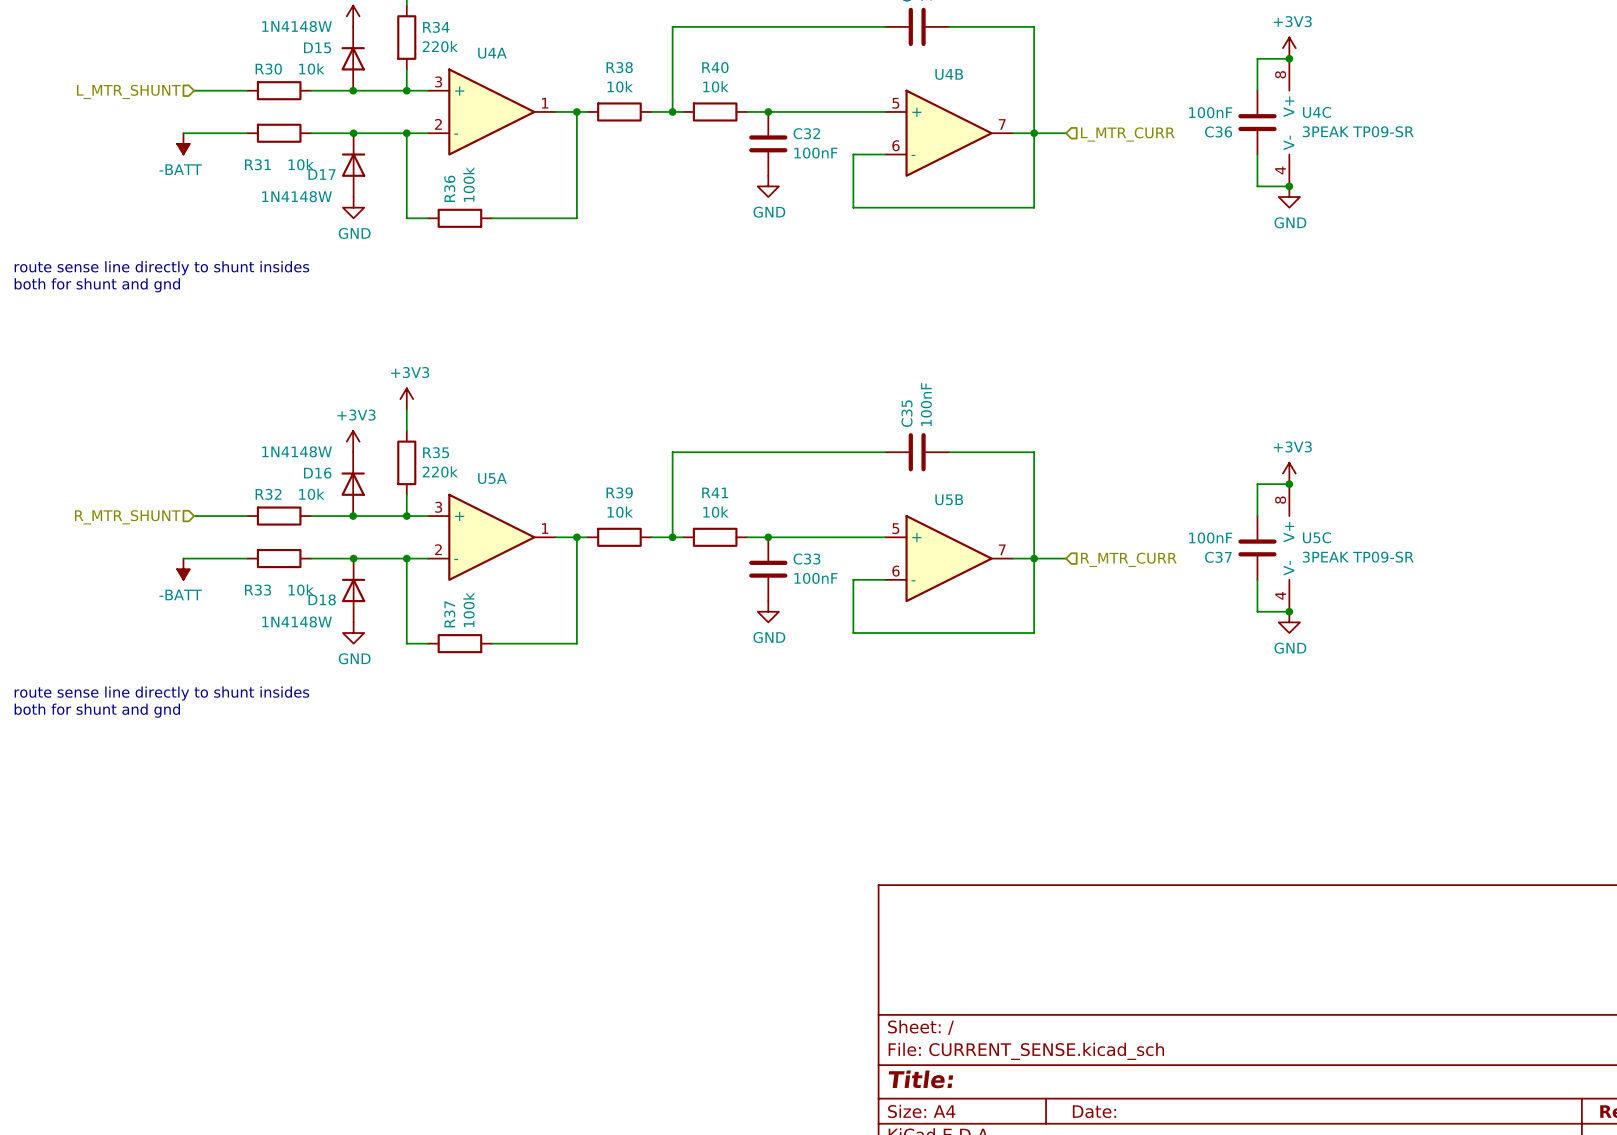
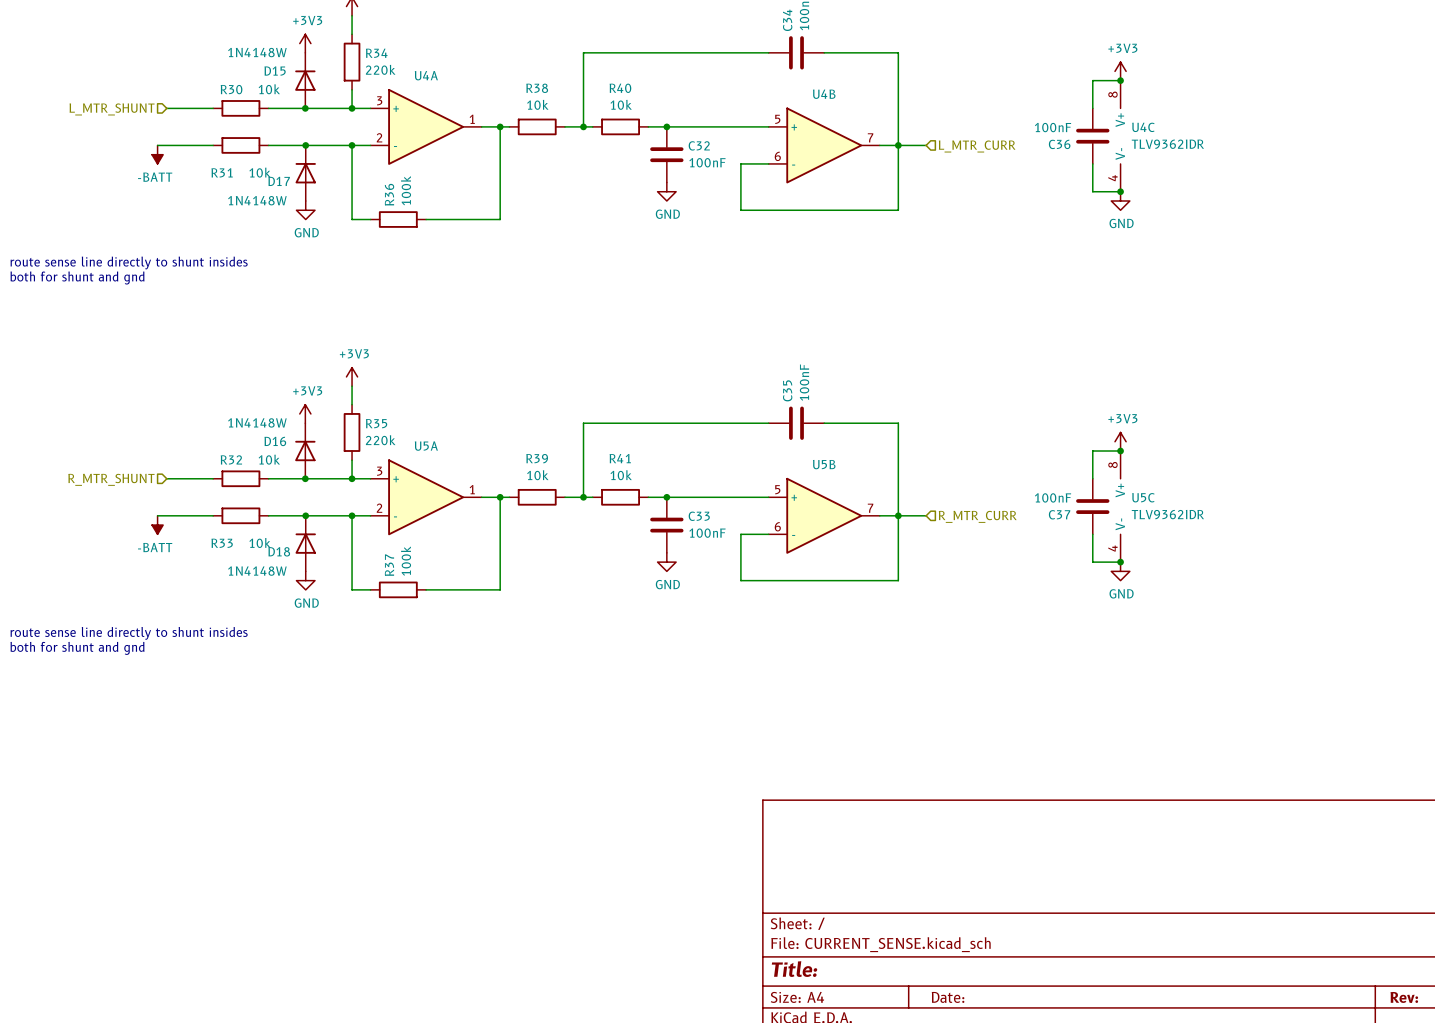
U4C value: 3PEAK TP09-SR (1358, 131) -> TLV9362IDR (1167, 144)
U5C value: 3PEAK TP09-SR (1358, 557) -> TLV9362IDR (1167, 514)

